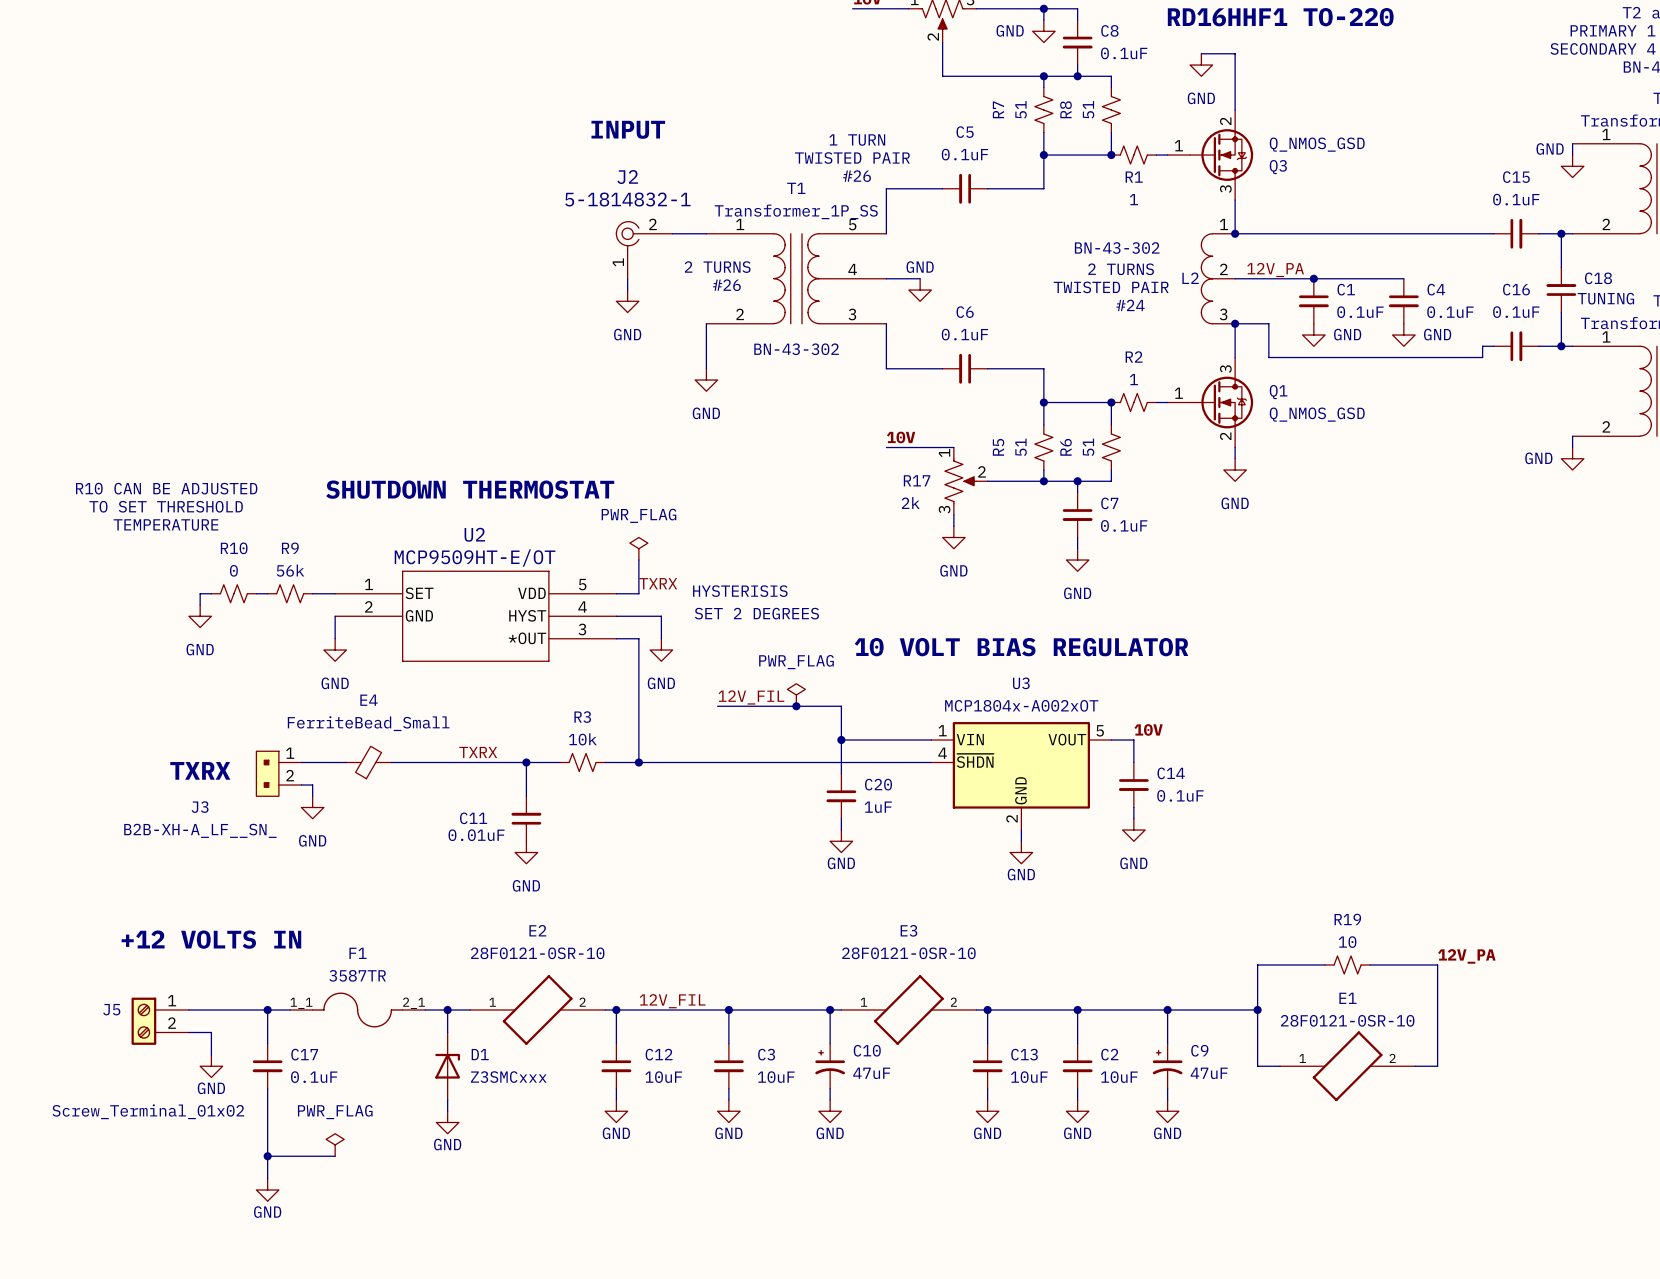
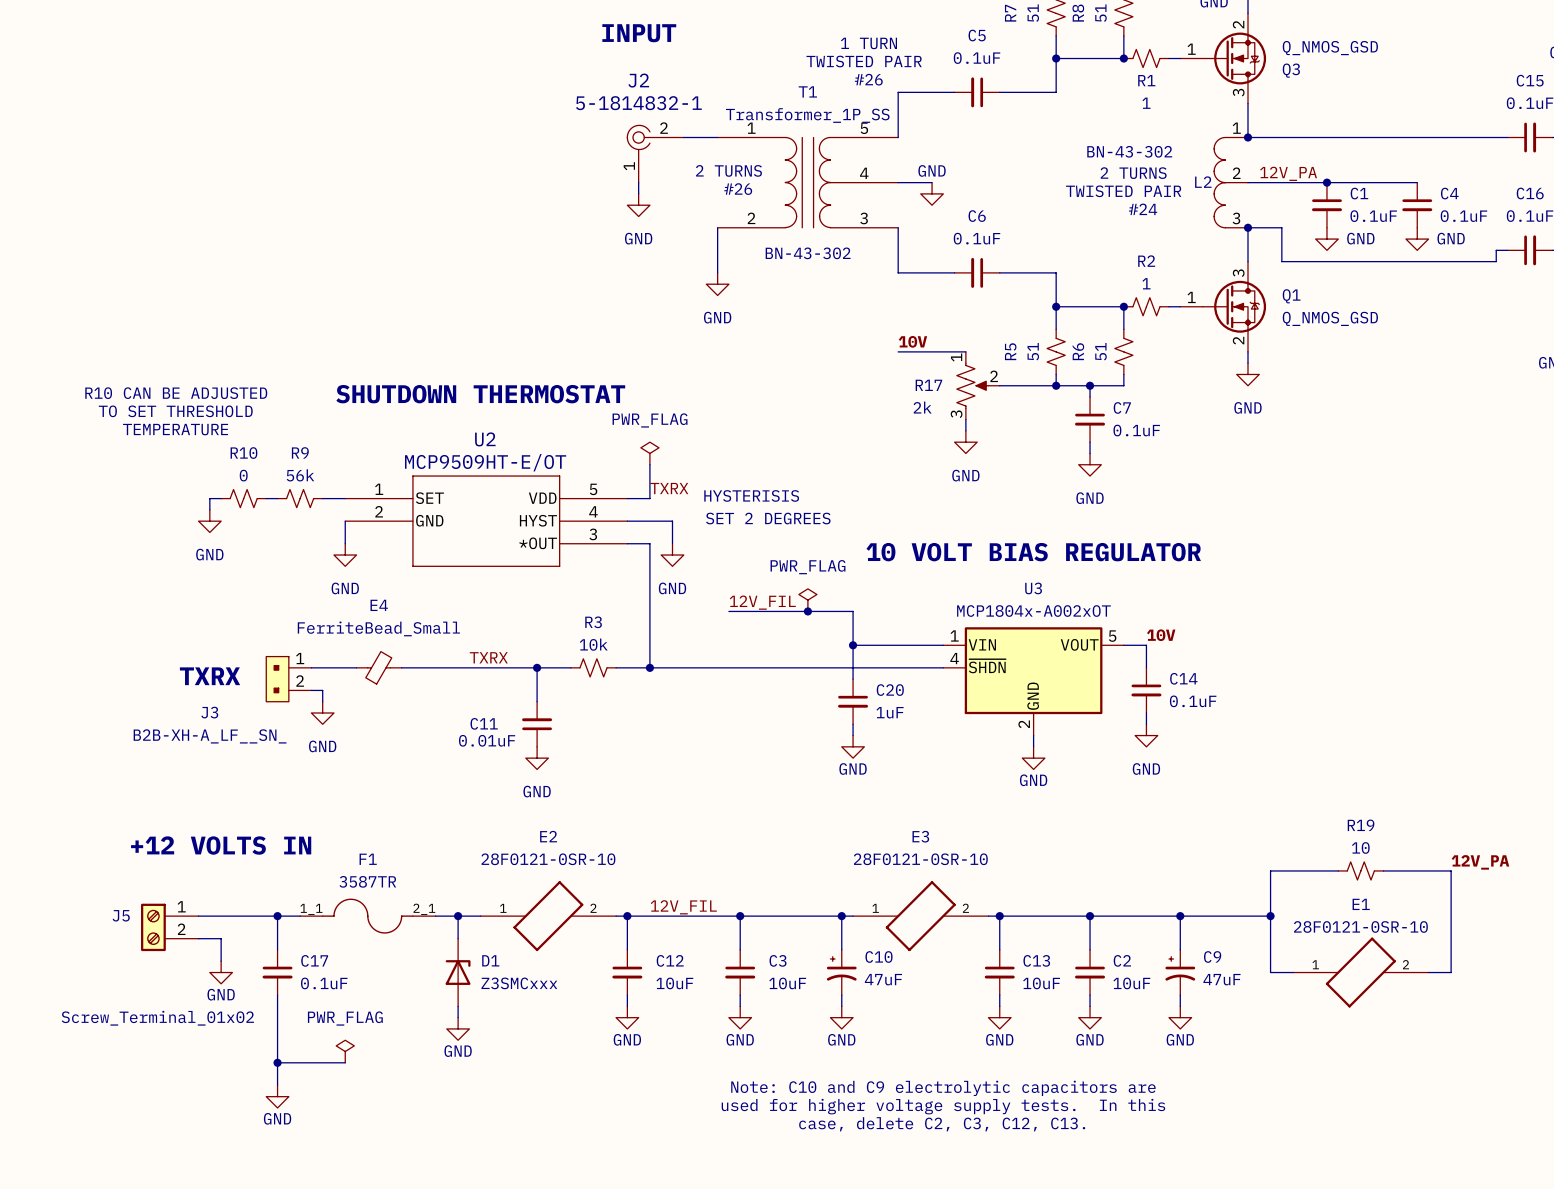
text: none -> Note: C10 and C9 electrolytic capacitors are (943, 1088)
text: none -> used for higher voltage supply tests. In this (943, 1106)
text: none -> case, delete C2, C3, C12, C13. (942, 1124)

